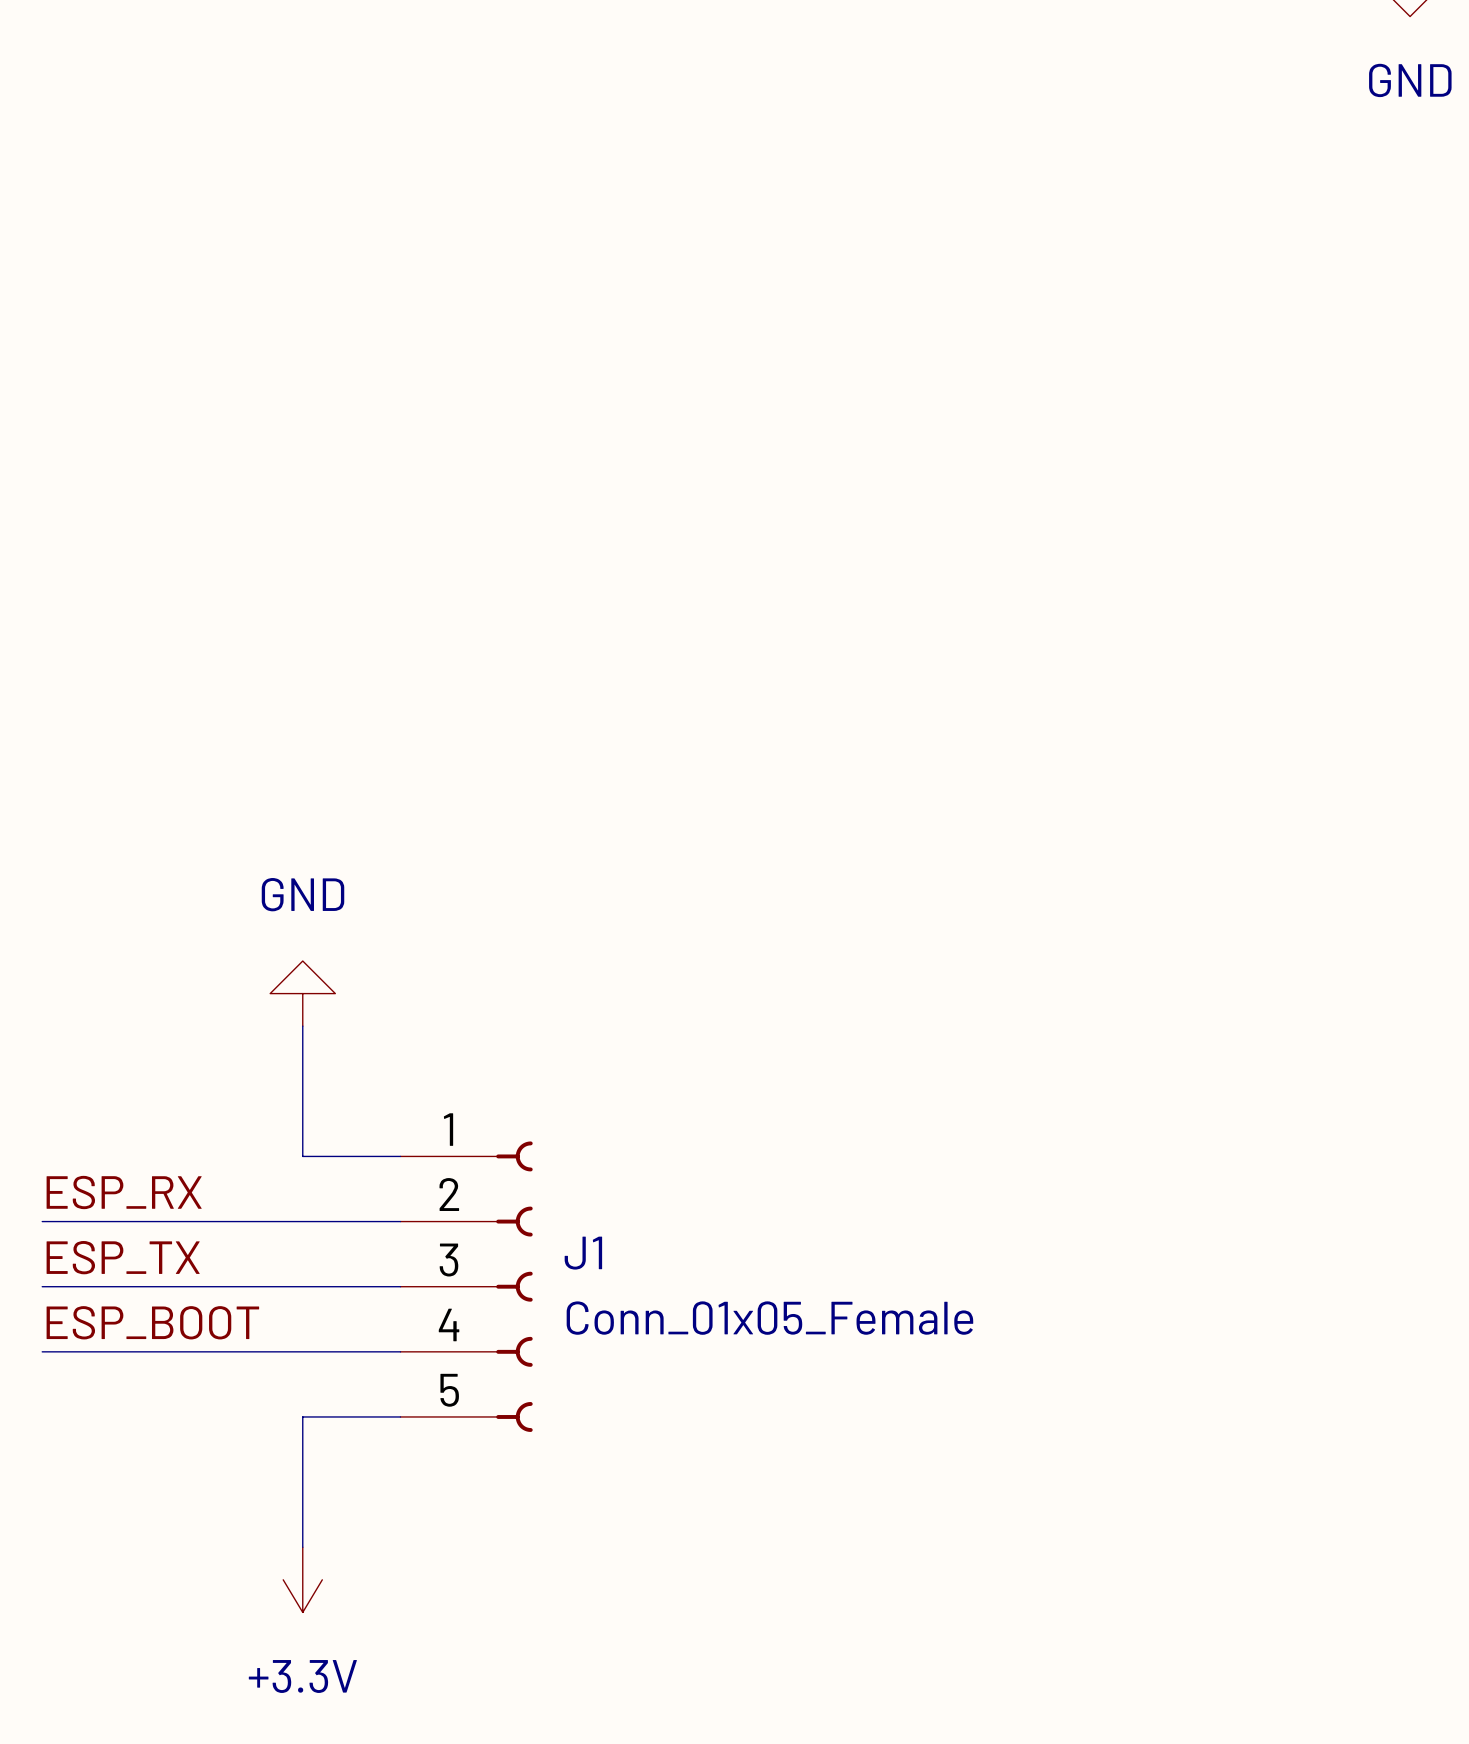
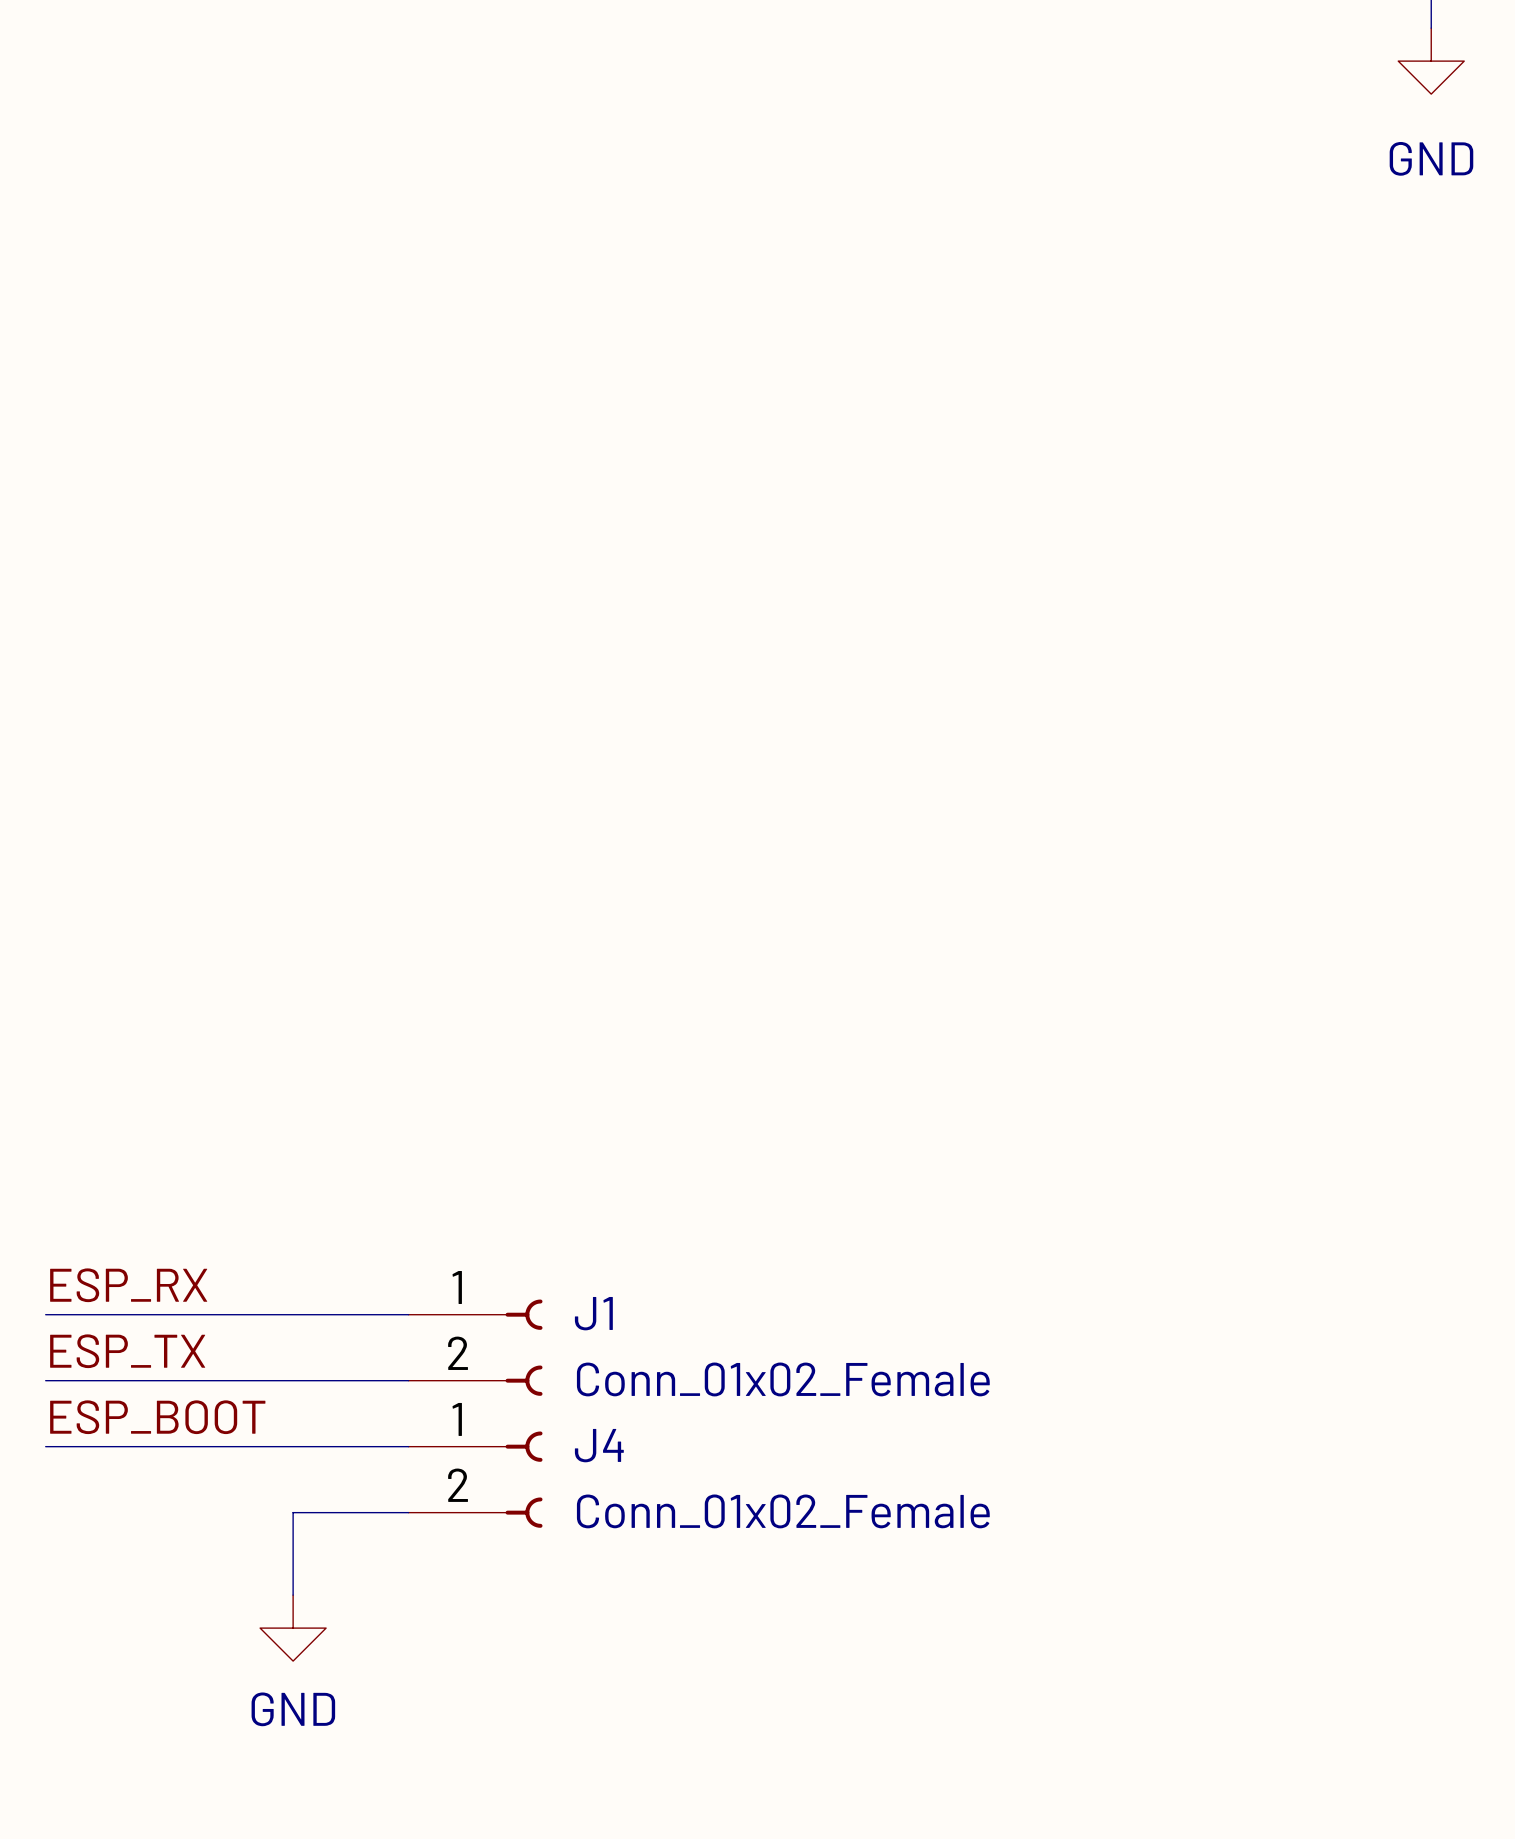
power symbol rotation: 0° (302, 993) -> 180° (293, 1628)
power symbol position: GND (302, 993) -> GND (293, 1628)
wire: (302, 1026) (302, 1156) (400, 1156) -> none
J1 symbol: [400, 1141, 533, 1432] -> [408, 1299, 543, 1396]
J1 value: Conn_01x05_Female (769, 1318) -> Conn_01x02_Female (783, 1379)
J4: none -> Conn_01x02_Female (475, 1479)
wire: (302, 1416) (302, 1547) -> (309, 1512) (293, 1512) (293, 1595)
power symbol: +3.3V (302, 1579) -> none

